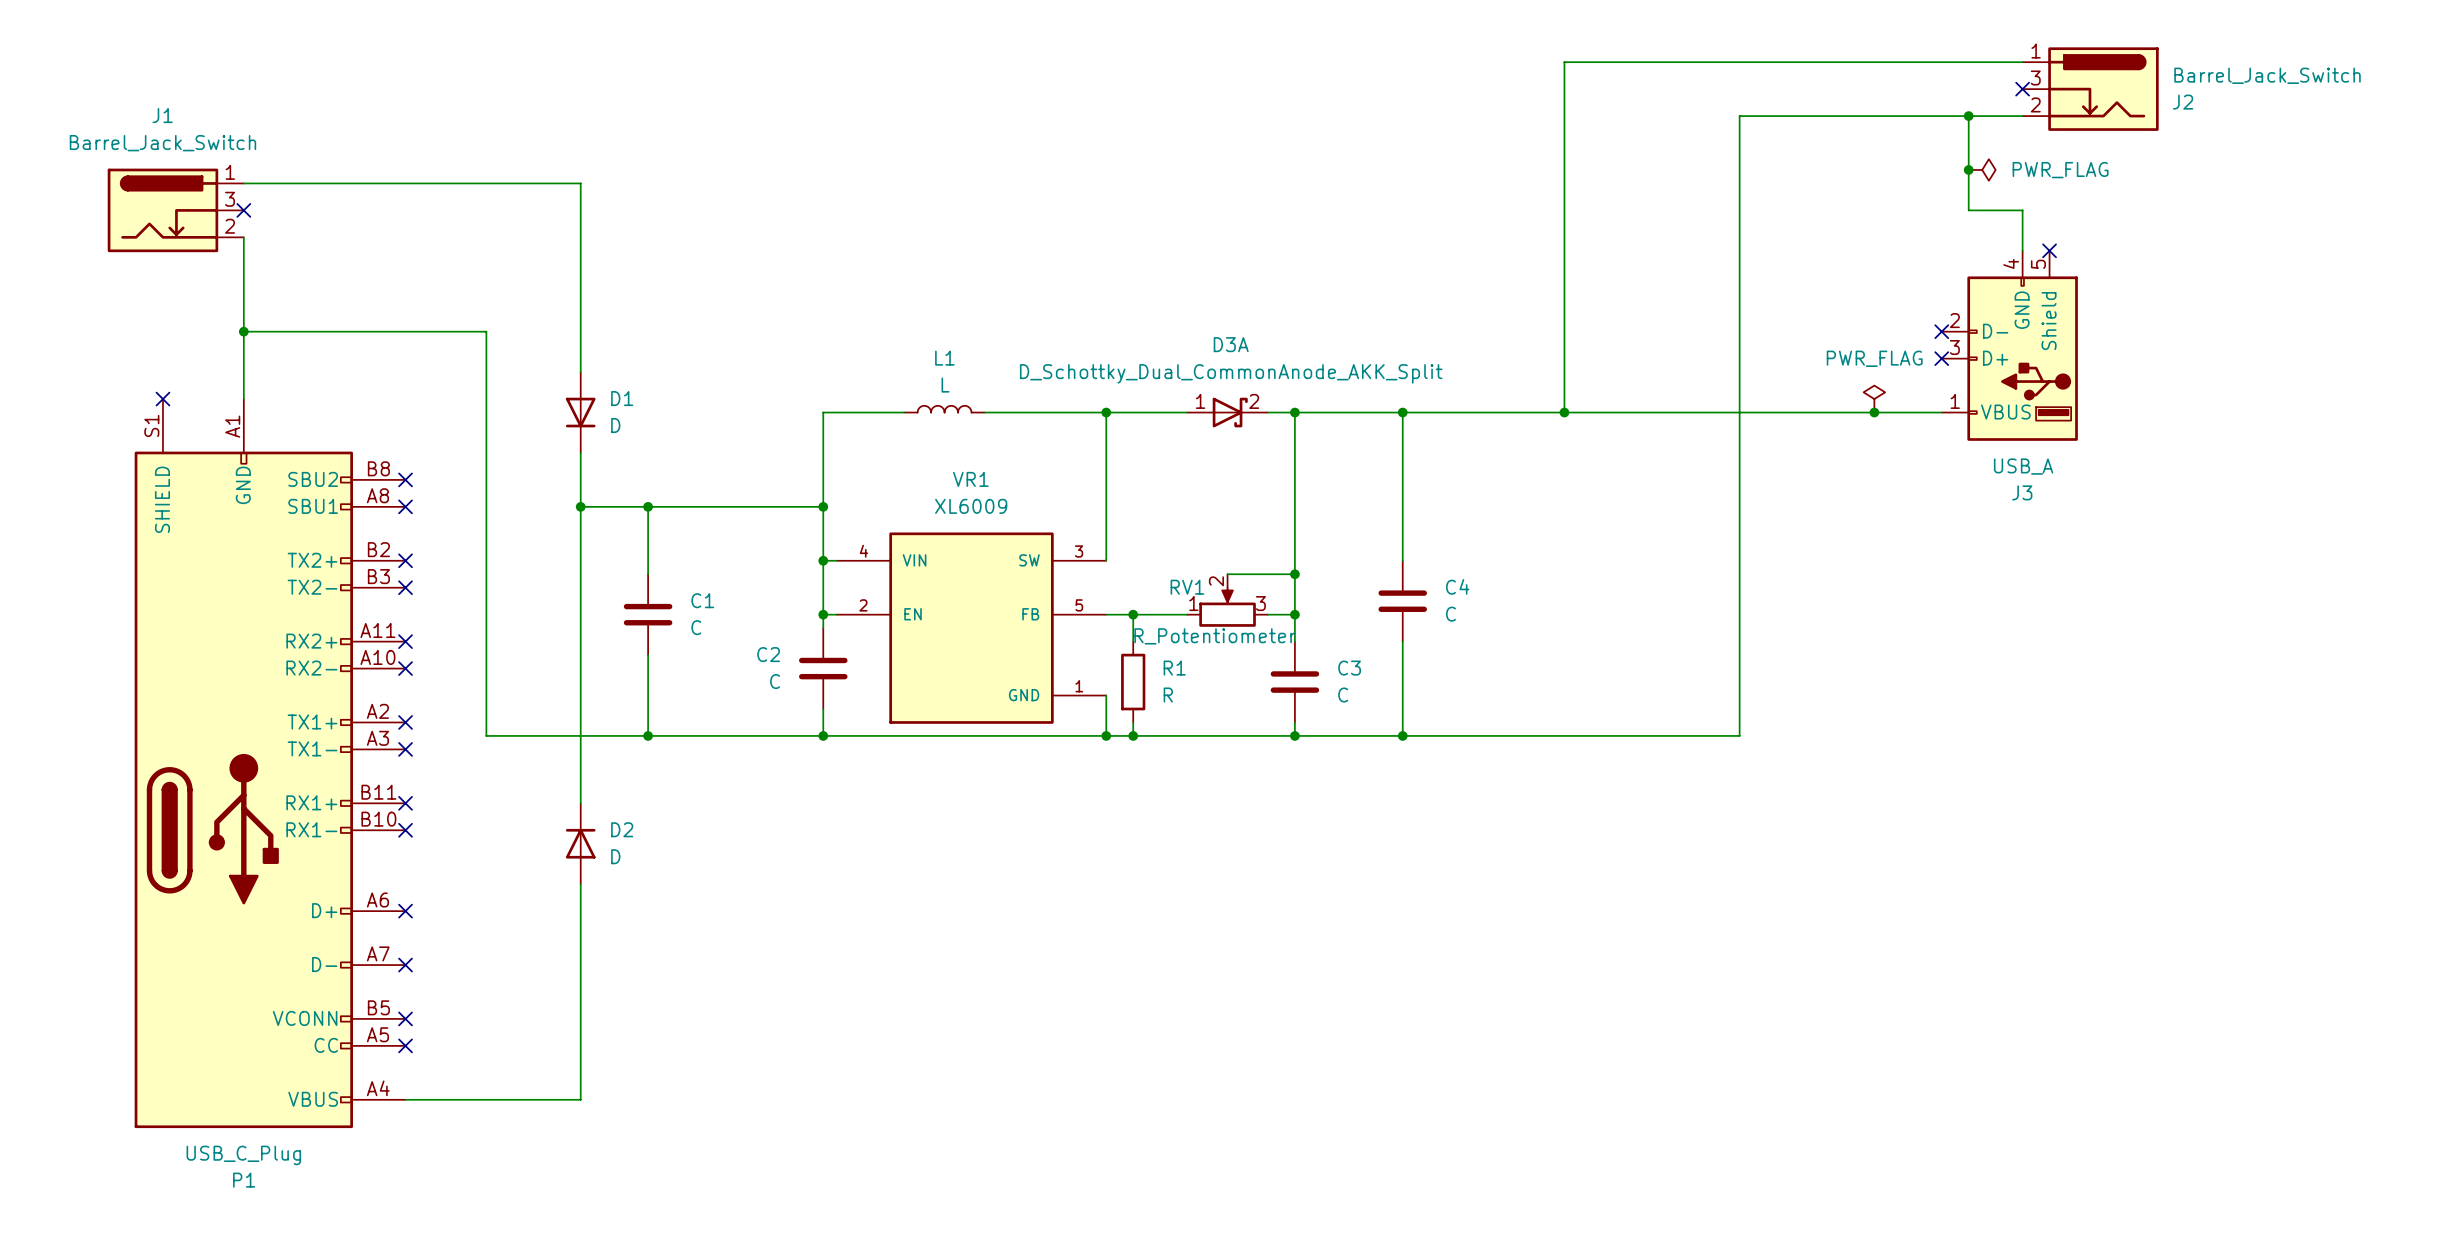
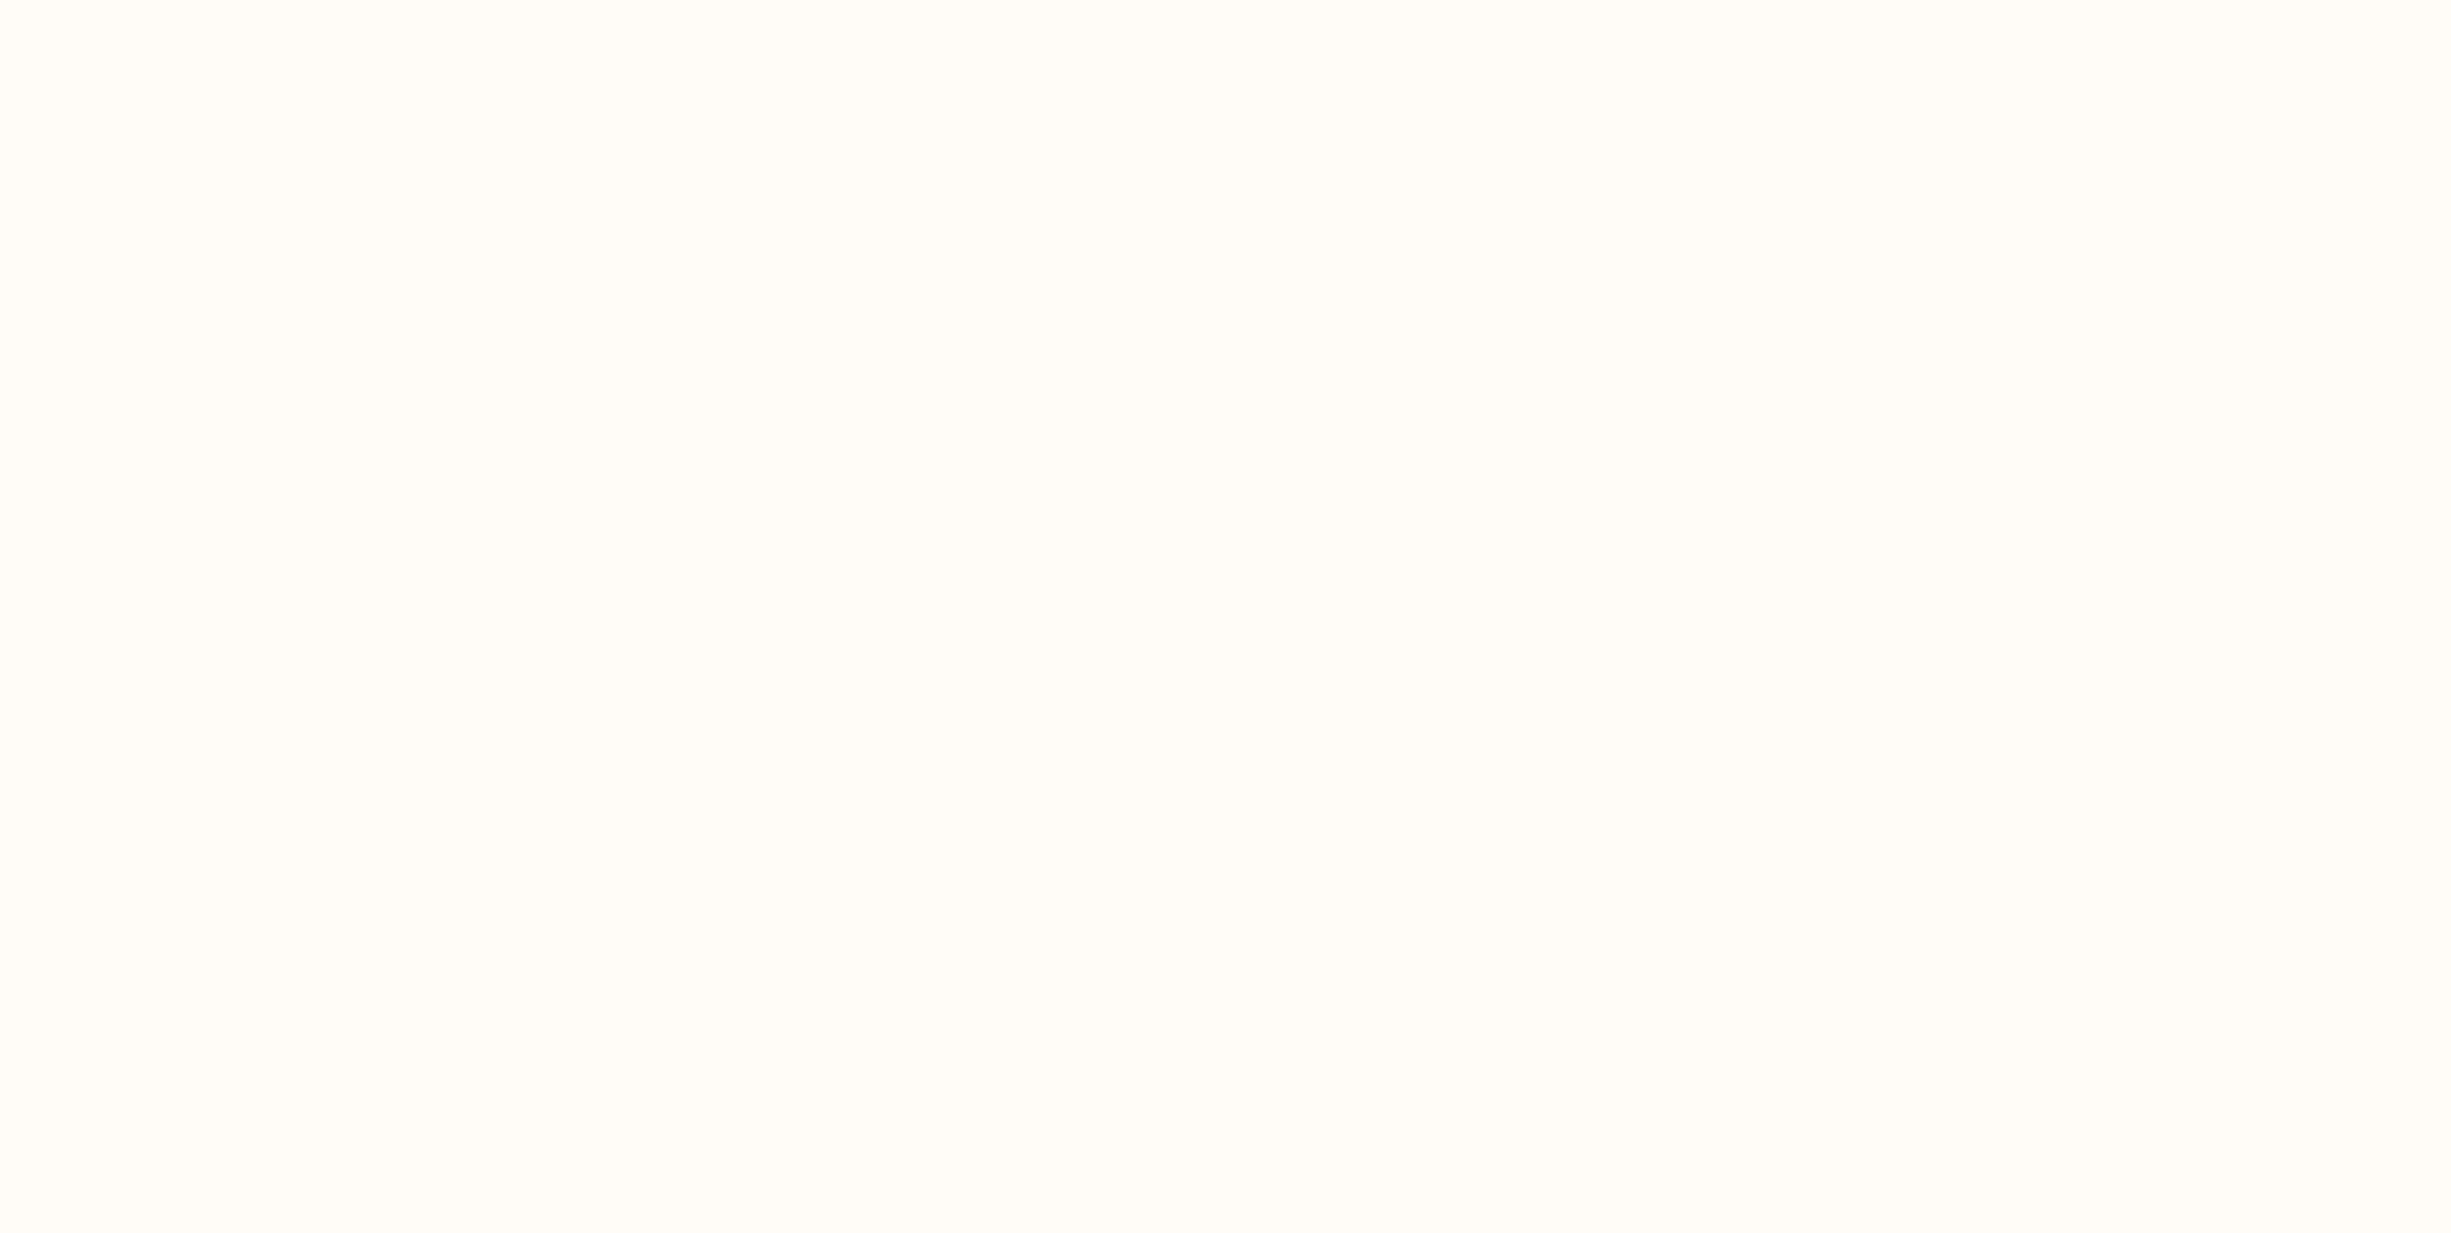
wire: (2022, 62) (1564, 62) (1564, 412) -> none
no-connect mark: (2022, 89) -> none
J2: Barrel_Jack_Switch (2090, 89) -> none
wire: (1968, 116) (1968, 210) (2022, 210) (2022, 250) -> none
junction: (1968, 116) -> none
wire: (2022, 116) (1739, 116) (1739, 735) (486, 735) (486, 331) (243, 331) -> none
junction: (1968, 169) -> none
power symbol: PWR_FLAG (1982, 169) -> none
wire: (243, 183) (580, 183) (580, 372) -> none
J1: Barrel_Jack_Switch (175, 210) -> none
no-connect mark: (243, 210) -> none
wire: (243, 237) (243, 399) -> none
no-connect mark: (2049, 250) -> none
junction: (243, 331) -> none
no-connect mark: (1941, 331) -> none
J3: USB_A (2009, 345) -> none
no-connect mark: (1941, 358) -> none
no-connect mark: (162, 399) -> none
power symbol: PWR_FLAG (1874, 399) -> none
L1: L (944, 409) -> none
D1: D (580, 412) -> none
wire: (904, 412) (823, 412) (823, 628) -> none
wire: (984, 412) (1187, 412) -> none
wire: (1106, 412) (1106, 560) -> none
junction: (1106, 412) -> none
D3A: D_Schottky_Dual_CommonAnode_AKK_Split (1227, 412) -> none
wire: (1267, 412) (1941, 412) -> none
wire: (1294, 412) (1294, 641) -> none
junction: (1294, 412) -> none
wire: (1402, 412) (1402, 560) -> none
junction: (1402, 412) -> none
junction: (1564, 412) -> none
junction: (1874, 412) -> none
wire: (580, 452) (580, 803) -> none
no-connect mark: (405, 479) -> none
no-connect mark: (405, 506) -> none
wire: (580, 506) (823, 506) -> none
junction: (580, 506) -> none
wire: (648, 506) (648, 574) -> none
junction: (648, 506) -> none
junction: (823, 506) -> none
no-connect mark: (405, 560) -> none
wire: (823, 560) (836, 560) -> none
junction: (823, 560) -> none
wire: (1227, 574) (1294, 574) -> none
junction: (1294, 574) -> none
no-connect mark: (405, 587) -> none
RV1: R_Potentiometer (1227, 600) -> none
C4: C (1402, 601) -> none
C1: C (648, 614) -> none
wire: (823, 614) (836, 614) -> none
junction: (823, 614) -> none
wire: (1106, 614) (1187, 614) -> none
wire: (1133, 614) (1133, 641) -> none
junction: (1133, 614) -> none
wire: (1267, 614) (1294, 614) -> none
junction: (1294, 614) -> none
VR1: XL6009 (971, 628) -> none
no-connect mark: (405, 641) -> none
wire: (1402, 641) (1402, 735) -> none
wire: (648, 655) (648, 735) -> none
no-connect mark: (405, 668) -> none
C2: C (823, 668) -> none
R1: R (1133, 682) -> none
C3: C (1294, 682) -> none
wire: (1106, 695) (1106, 735) -> none
wire: (823, 709) (823, 735) -> none
no-connect mark: (405, 722) -> none
wire: (1133, 722) (1133, 735) -> none
wire: (1294, 722) (1294, 735) -> none
junction: (648, 735) -> none
junction: (823, 735) -> none
junction: (1106, 735) -> none
junction: (1133, 735) -> none
junction: (1294, 735) -> none
junction: (1402, 735) -> none
no-connect mark: (405, 749) -> none
P1: USB_C_Plug (270, 763) -> none
no-connect mark: (405, 803) -> none
no-connect mark: (405, 830) -> none
D2: D (580, 843) -> none
wire: (580, 884) (580, 1099) (405, 1099) -> none
no-connect mark: (405, 911) -> none
no-connect mark: (405, 965) -> none
no-connect mark: (405, 1018) -> none
no-connect mark: (405, 1045) -> none

